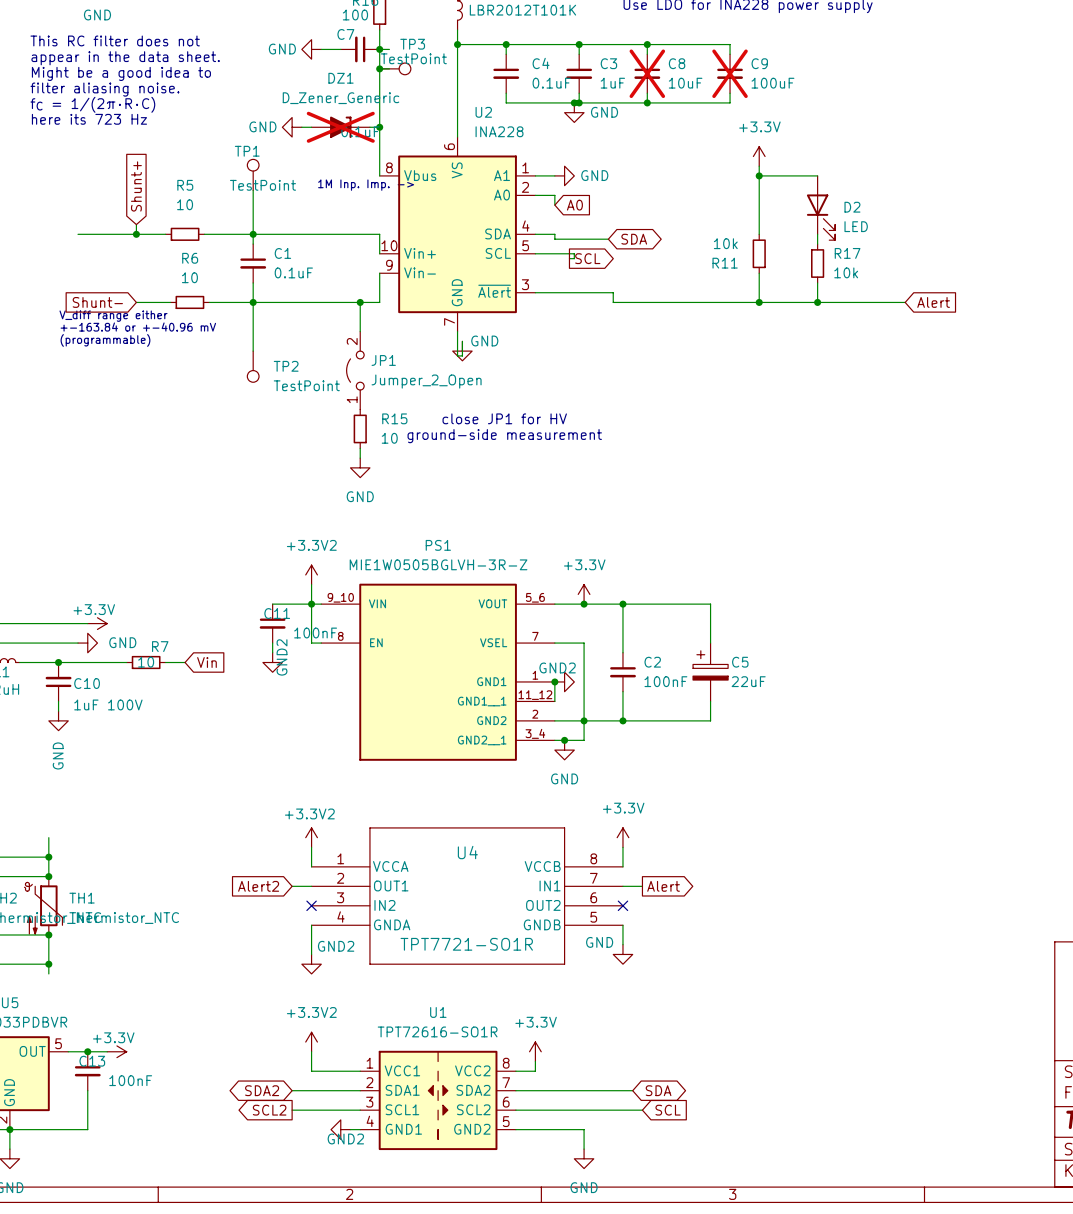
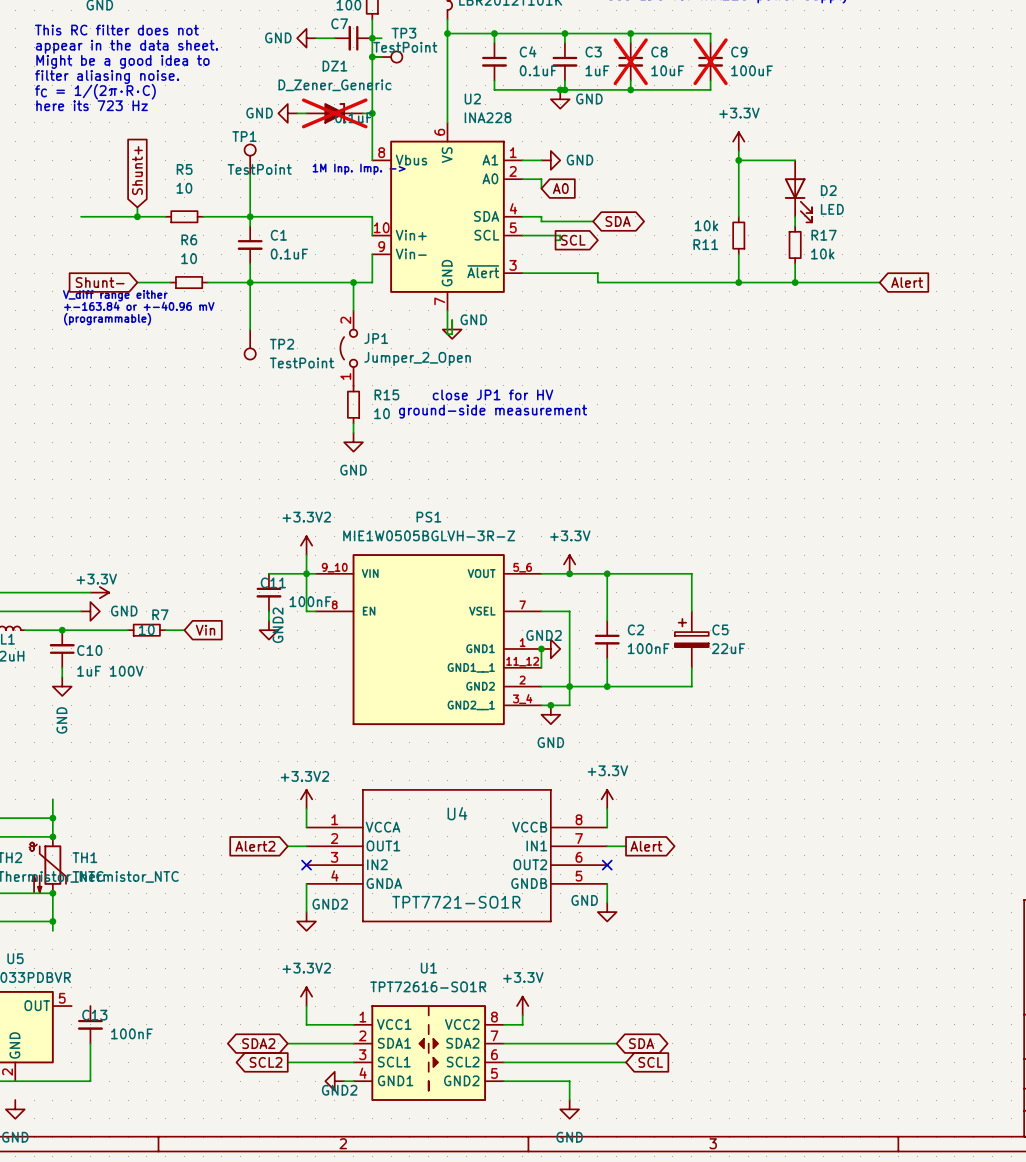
wire: (68, 1051) (107, 1051) -> none
junction: (87, 1051) -> none
power symbol: +3.3V (116, 1051) -> none
wire: (9, 1129) (9, 1149) -> none
junction: (9, 1129) -> none

